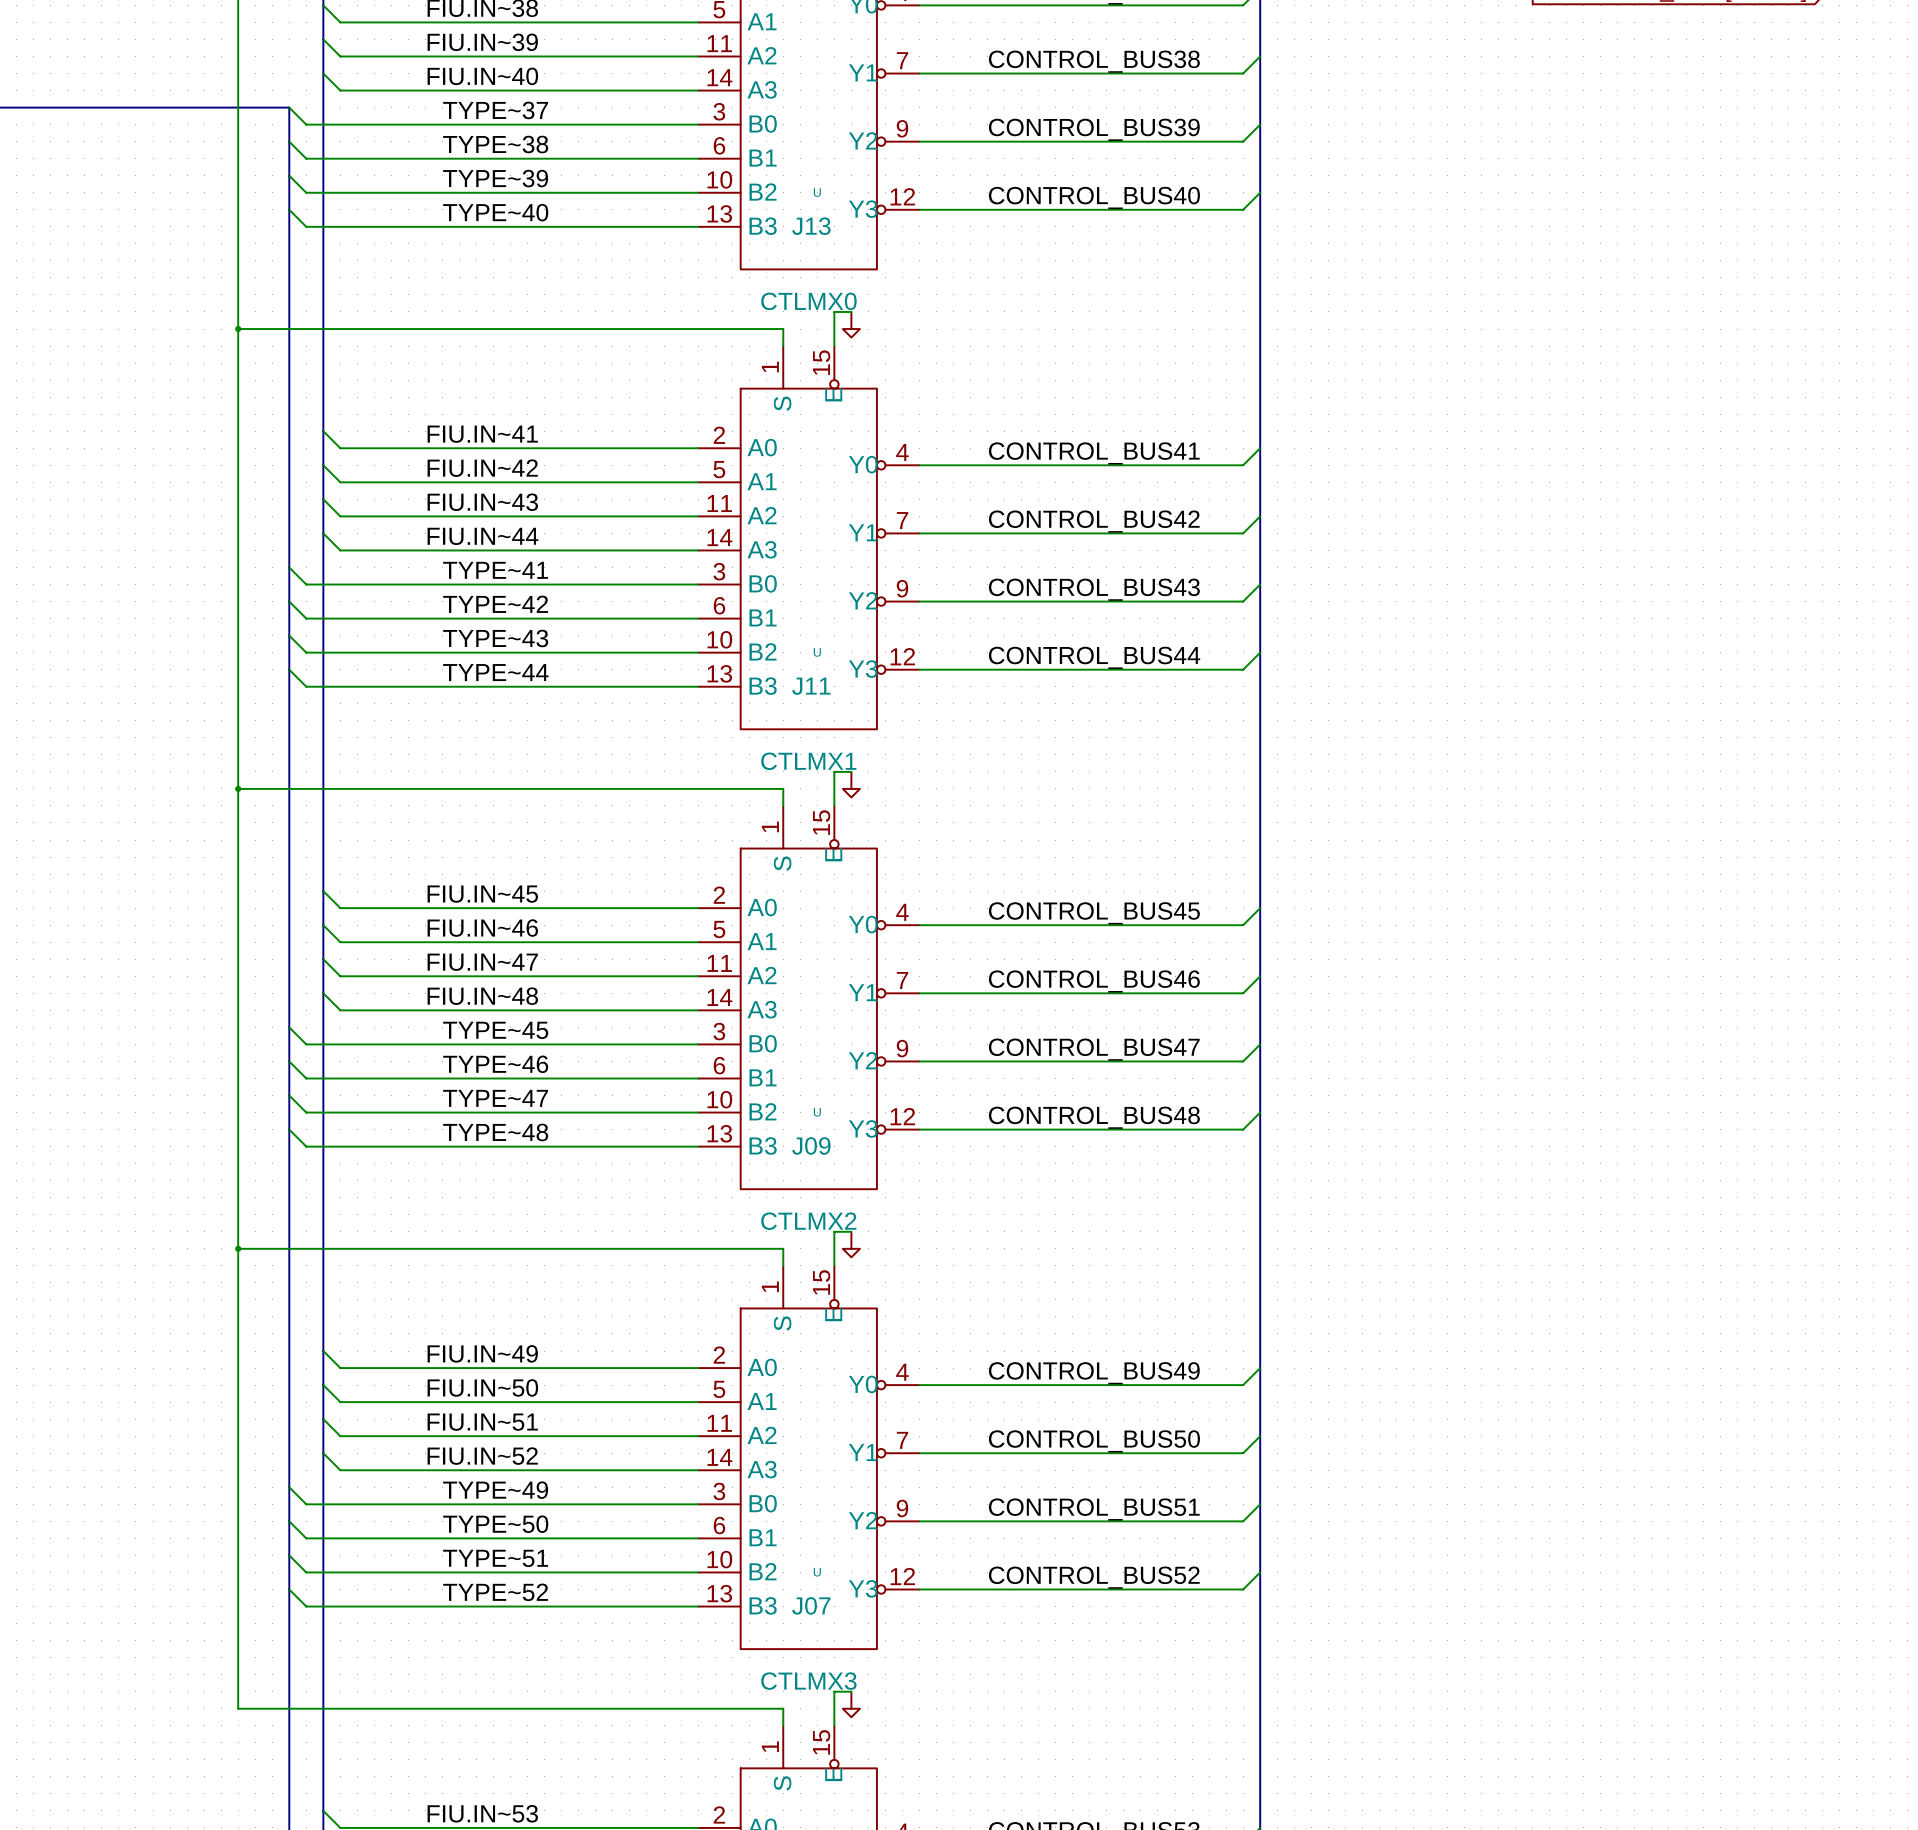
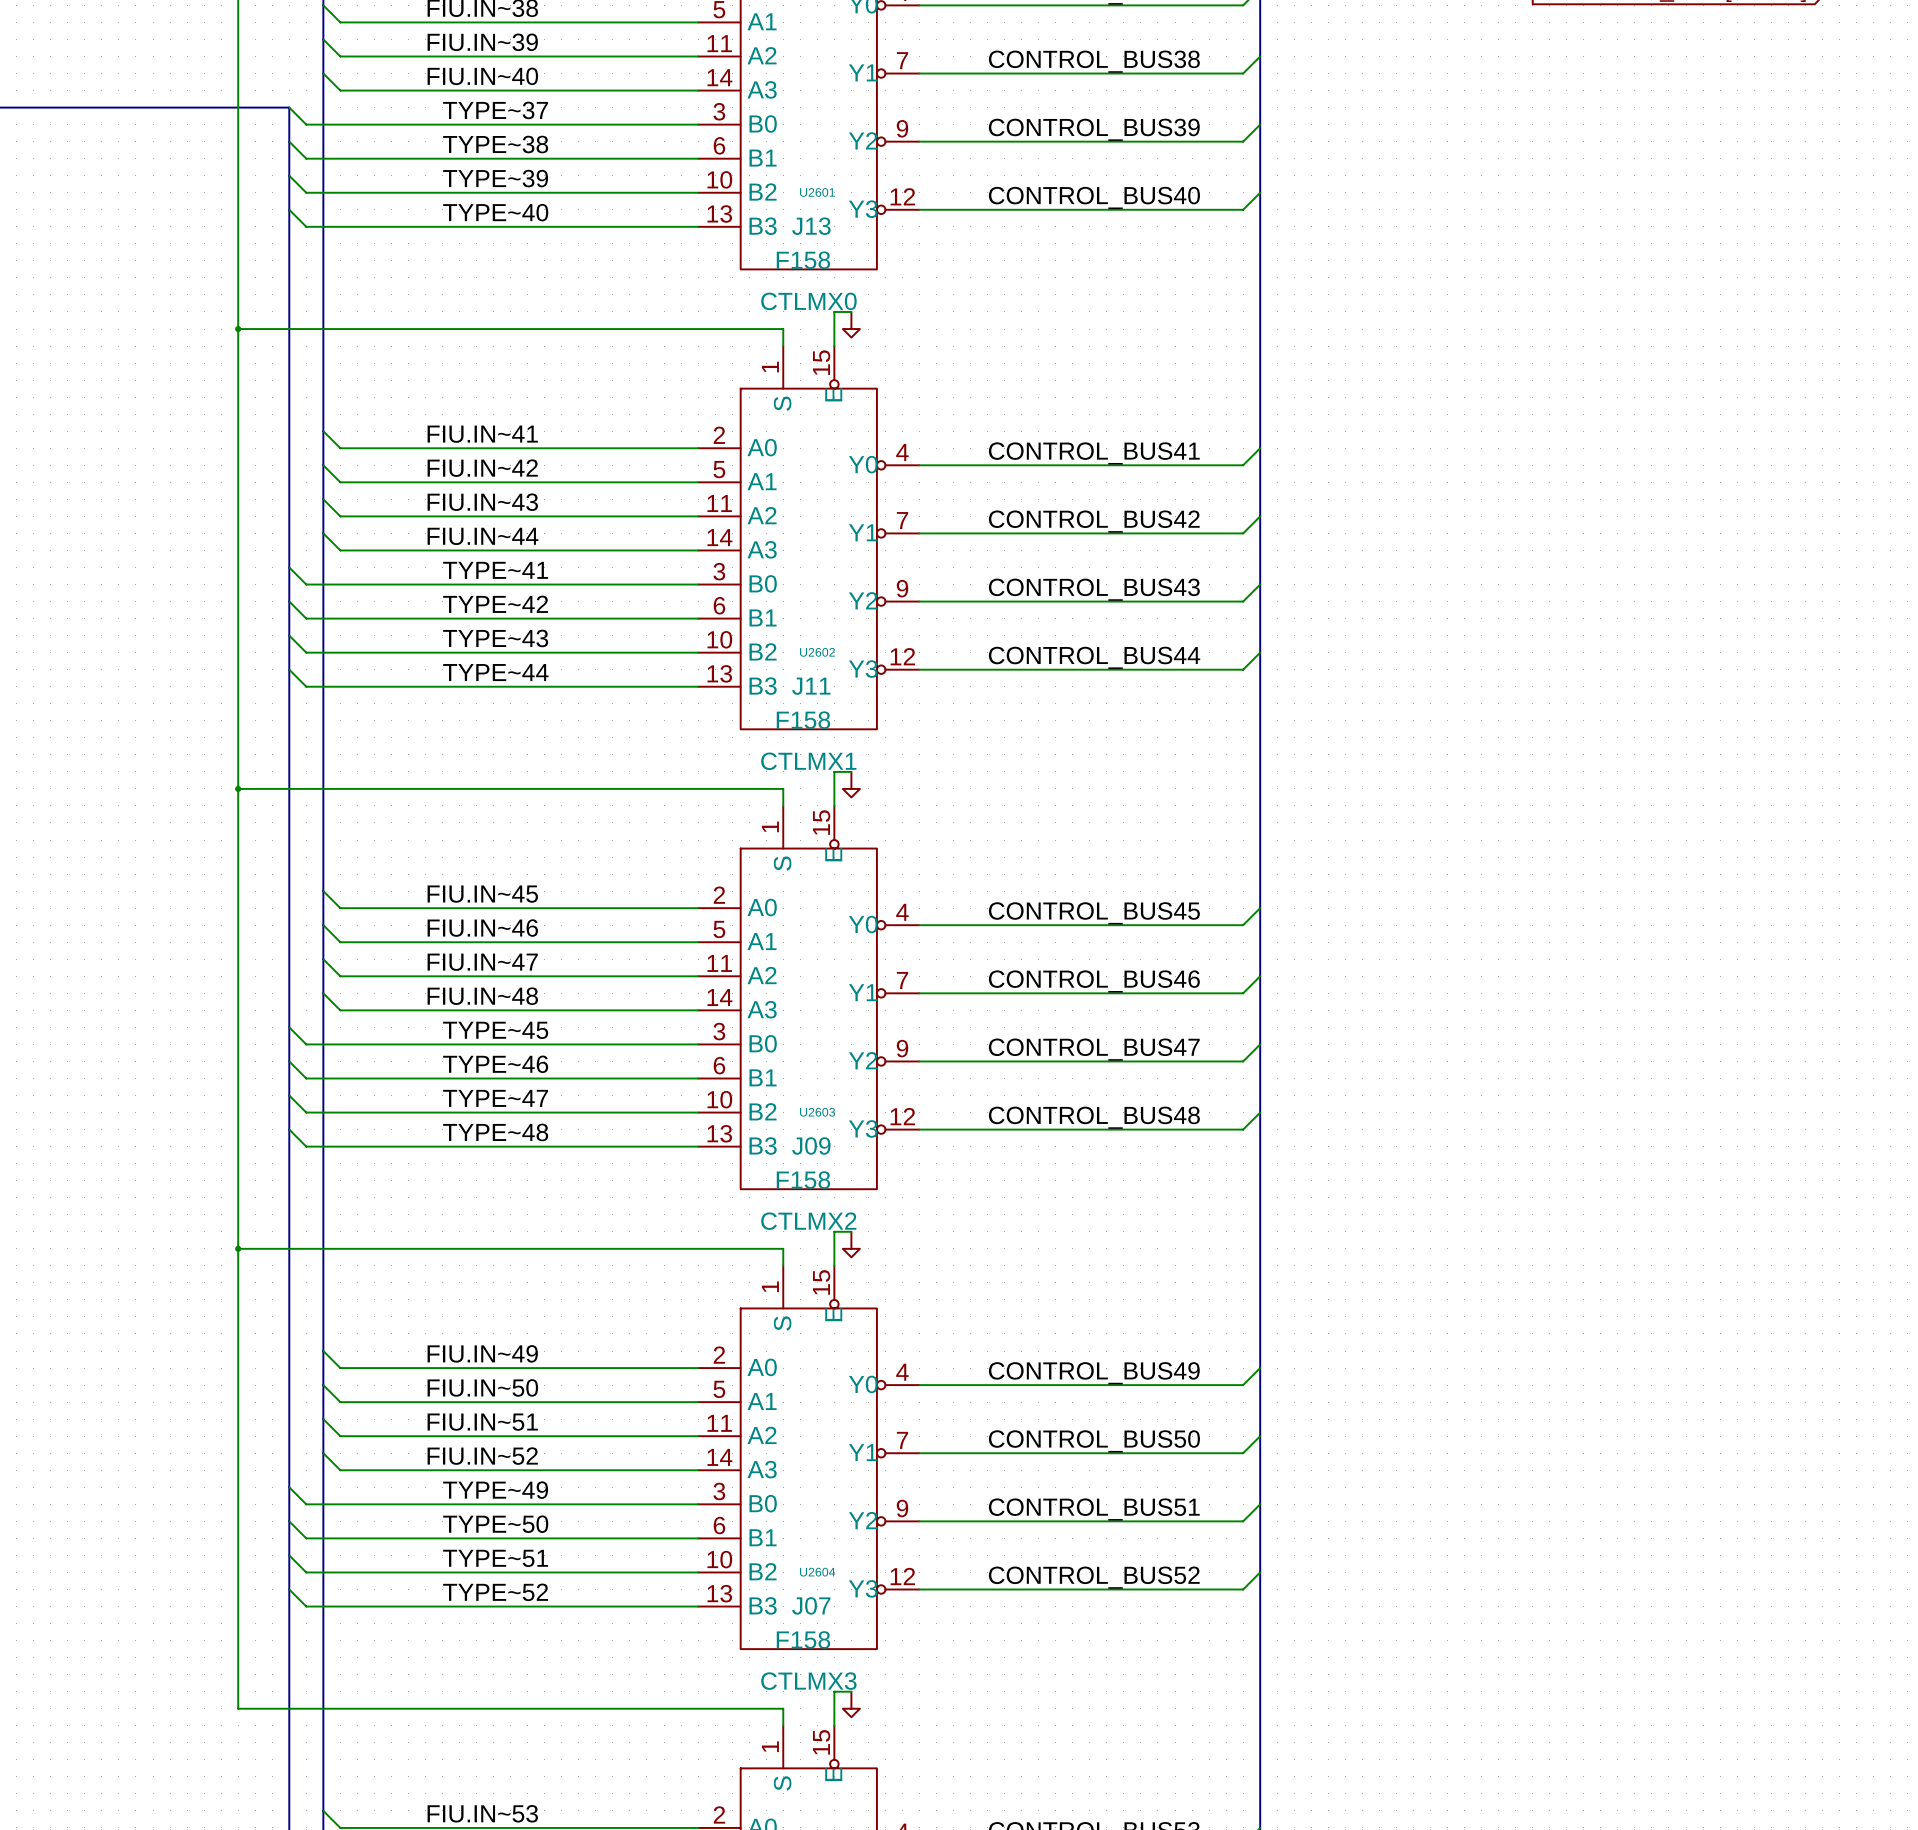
U name: U (817, 192) -> U2601 (817, 192)
U value: none -> F158 (803, 260)
U name: U (817, 652) -> U2602 (817, 652)
U value: none -> F158 (803, 720)
U name: U (817, 1112) -> U2603 (817, 1112)
U value: none -> F158 (803, 1180)
U name: U (817, 1572) -> U2604 (817, 1572)
U value: none -> F158 (803, 1639)

